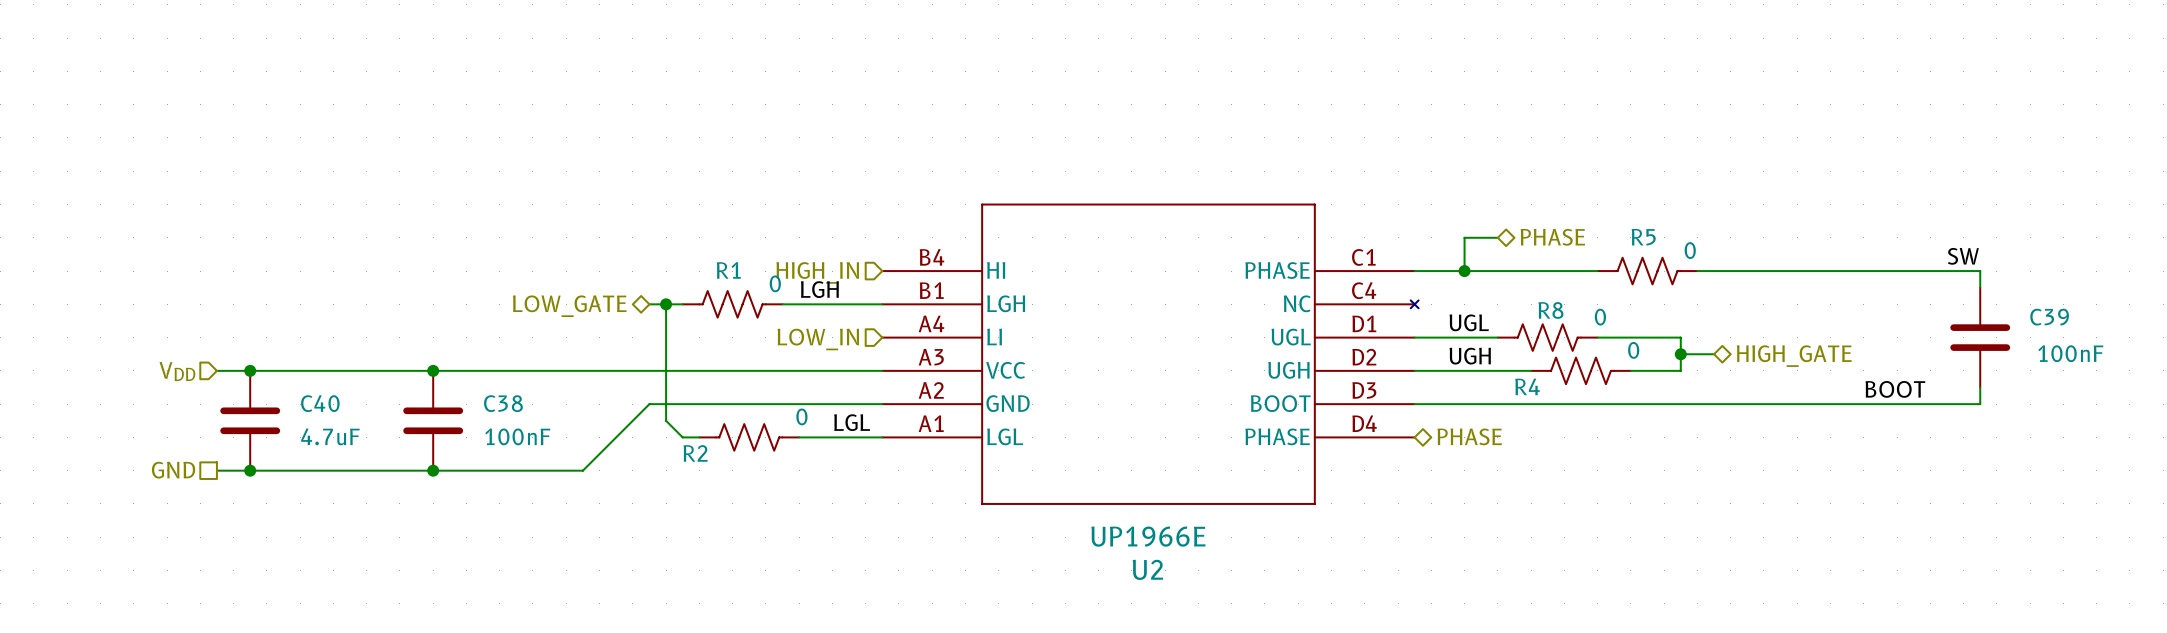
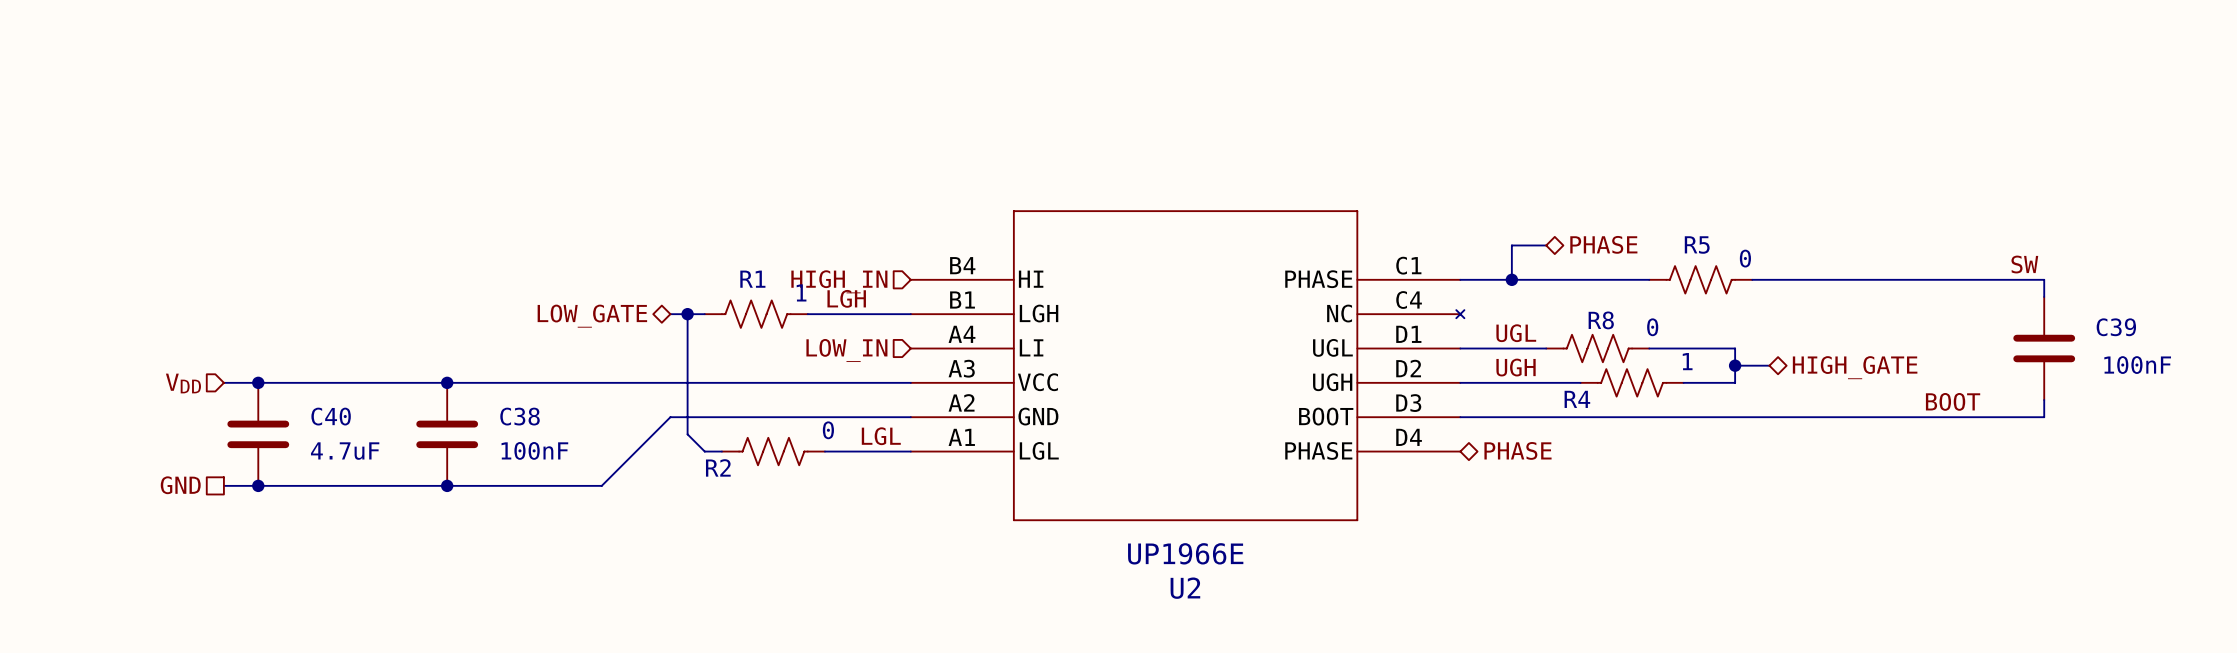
R1 value: 0 (775, 283) -> 1 (801, 292)
R4 value: 0 (1633, 350) -> 1 (1687, 361)

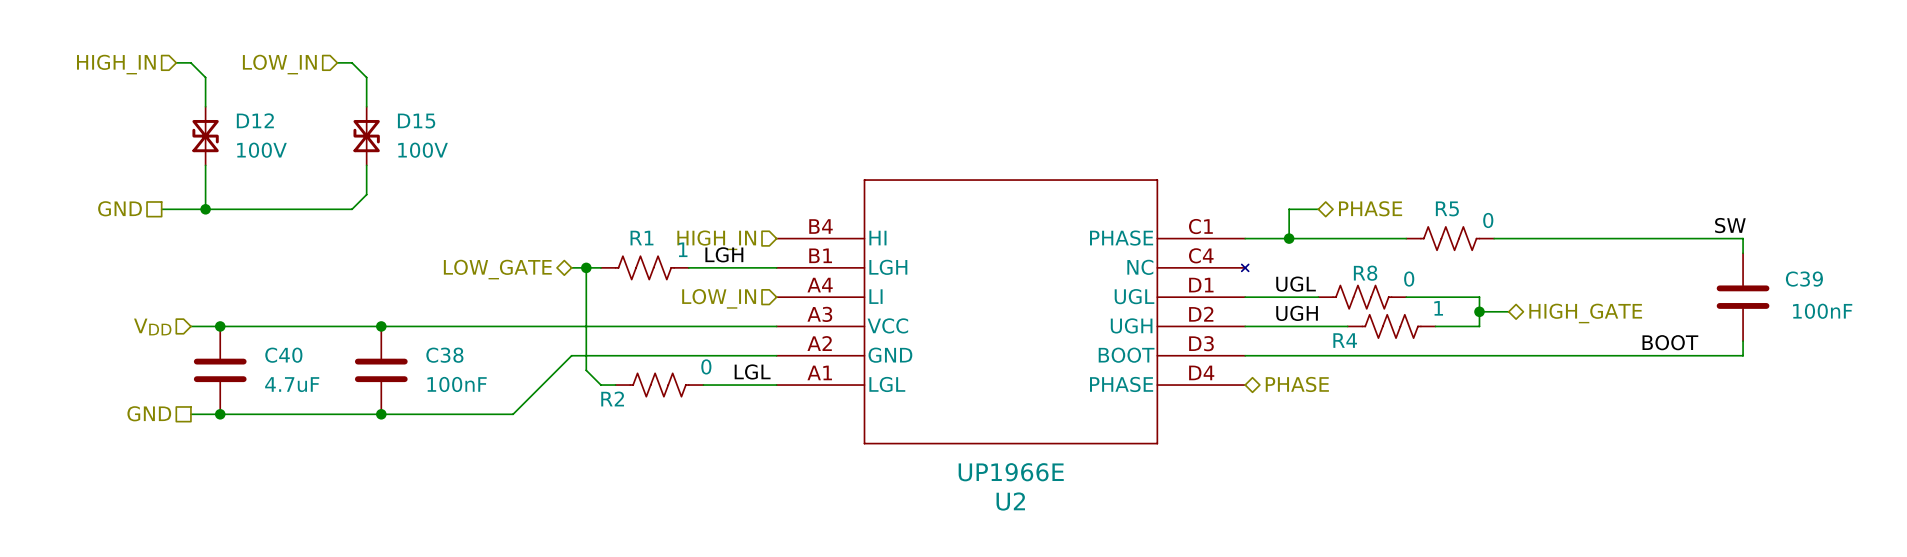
wire: none -> (176, 62) (190, 62) (205, 77) (205, 106)
wire: none -> (337, 62) (352, 62) (366, 77) (366, 106)
hierarchical label: none -> HIGH_IN (116, 64)
hierarchical label: none -> LOW_IN (279, 64)
D12: none -> 100V (205, 136)
D15: none -> 100V (366, 136)
wire: none -> (205, 165) (205, 209)
wire: none -> (366, 165) (366, 194) (352, 209) (161, 209)
hierarchical label: none -> GND (120, 208)
junction: none -> (205, 209)

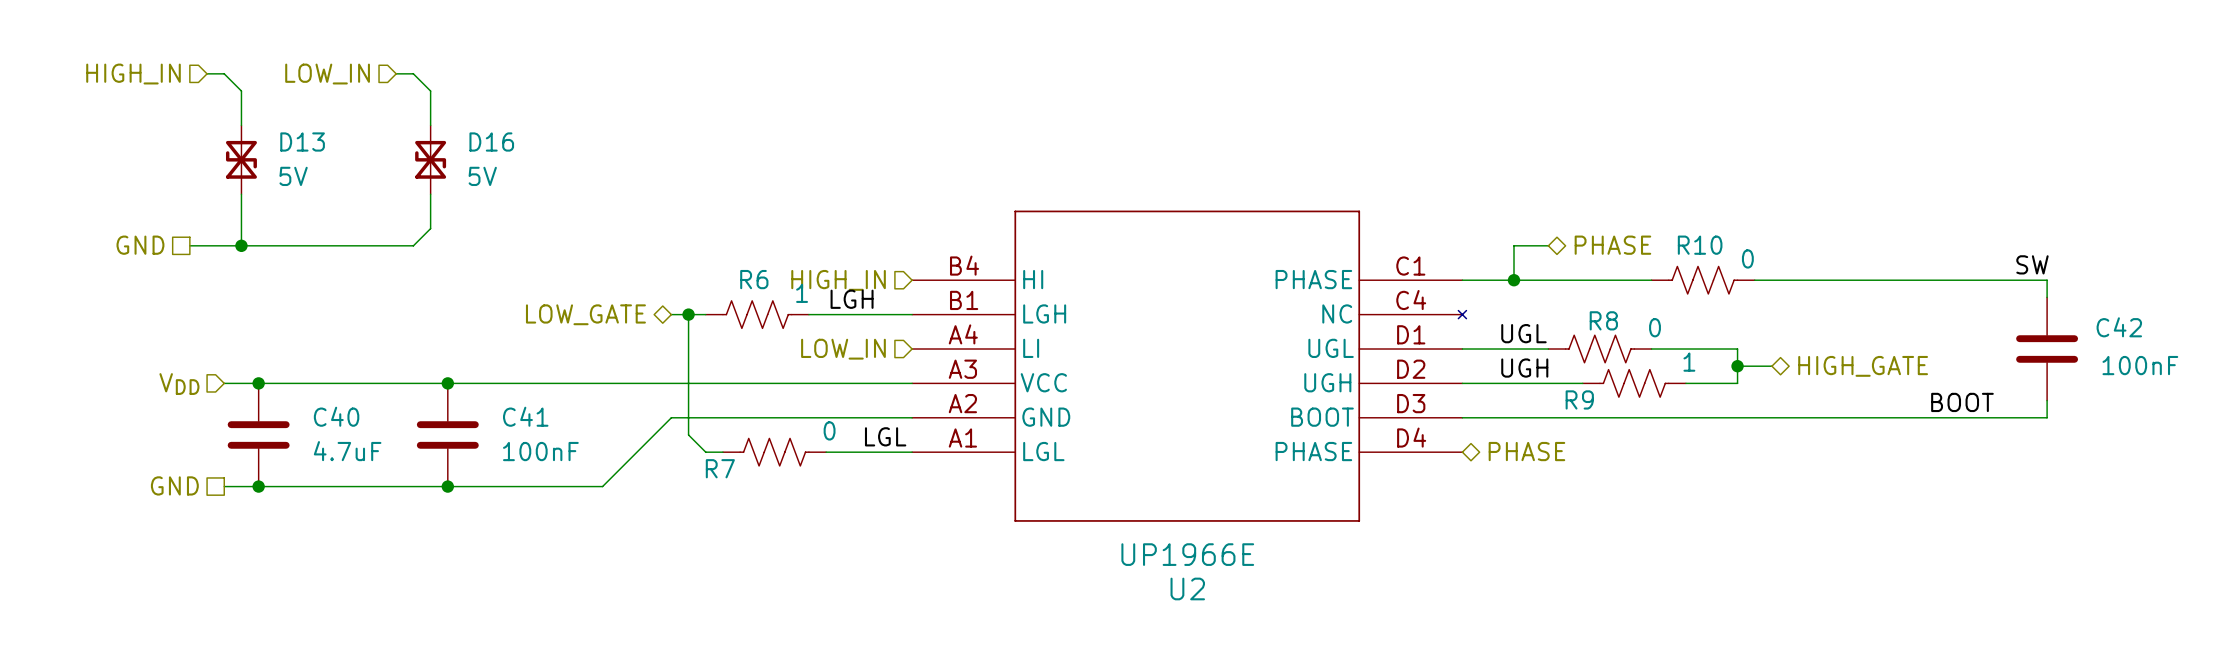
D12 name: D12 (255, 120) -> D13 (302, 142)
D15 name: D15 (416, 121) -> D16 (491, 142)
D12 value: 100V (261, 150) -> 5V (293, 176)
D15 value: 100V (423, 150) -> 5V (482, 176)
R5 name: R5 (1447, 208) -> R10 (1700, 245)
R1 name: R1 (641, 238) -> R6 (754, 279)
C39 name: C39 (1804, 279) -> C42 (2119, 327)
R4 name: R4 (1345, 340) -> R9 (1579, 399)
C38 name: C38 (444, 355) -> C41 (525, 416)
R2 name: R2 (612, 398) -> R7 (720, 468)

